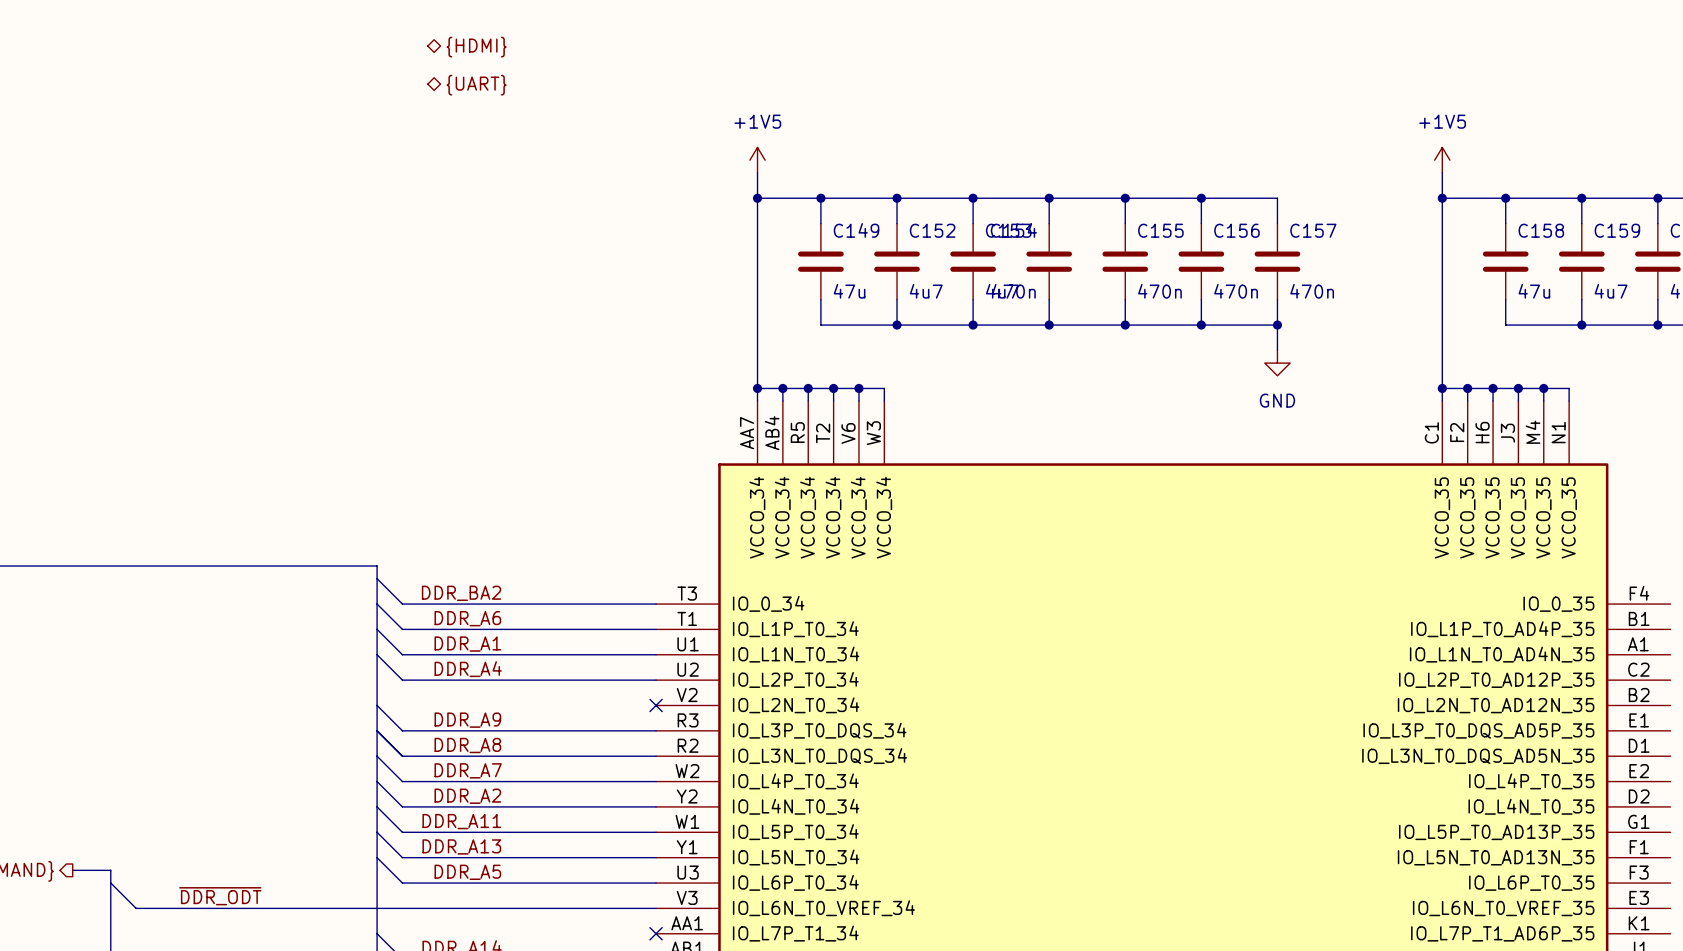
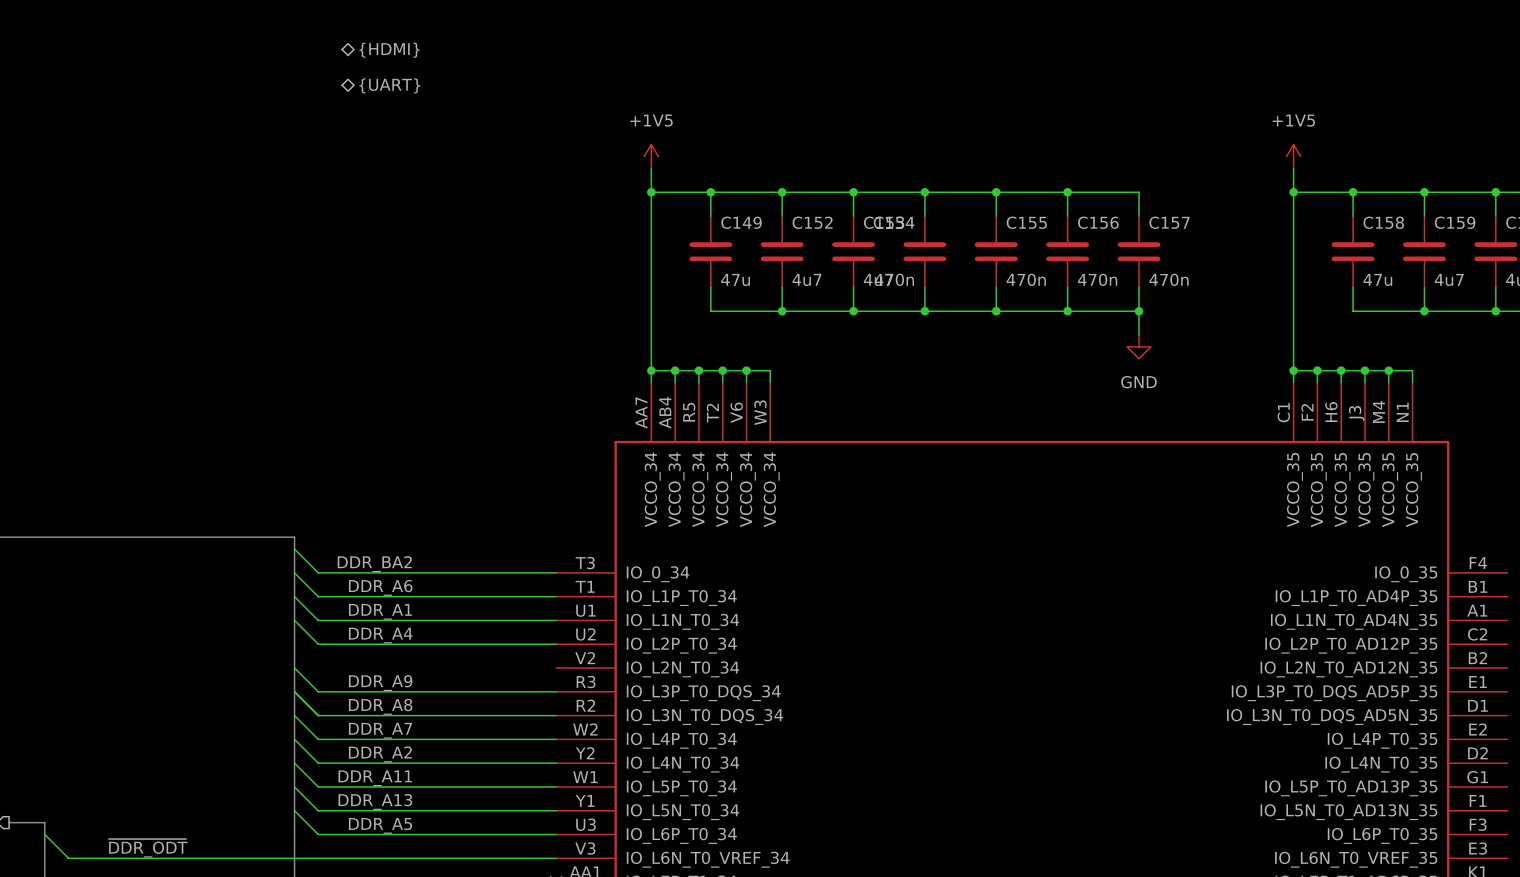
no-connect mark: (656, 705) -> none

